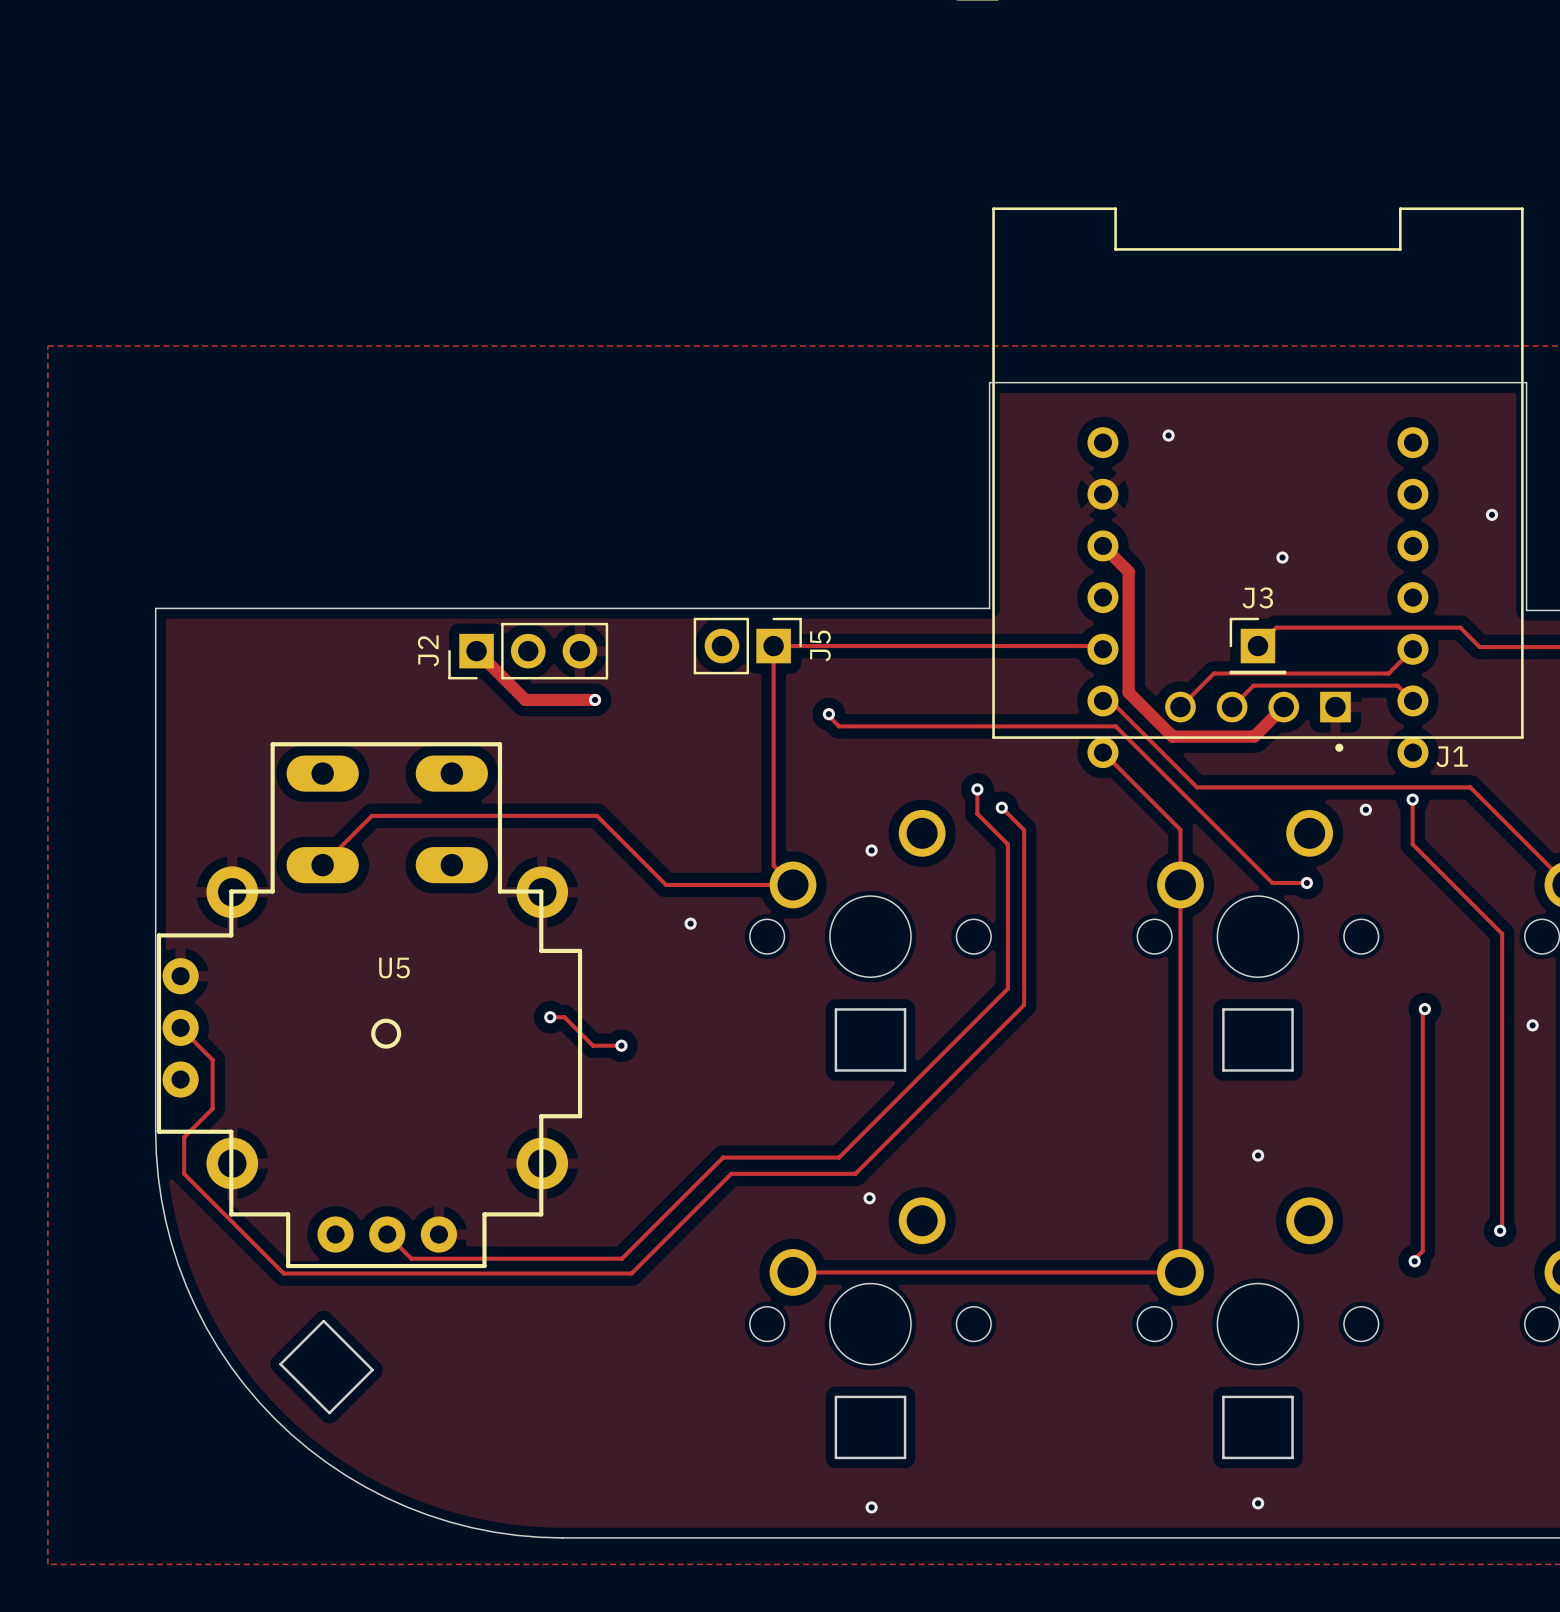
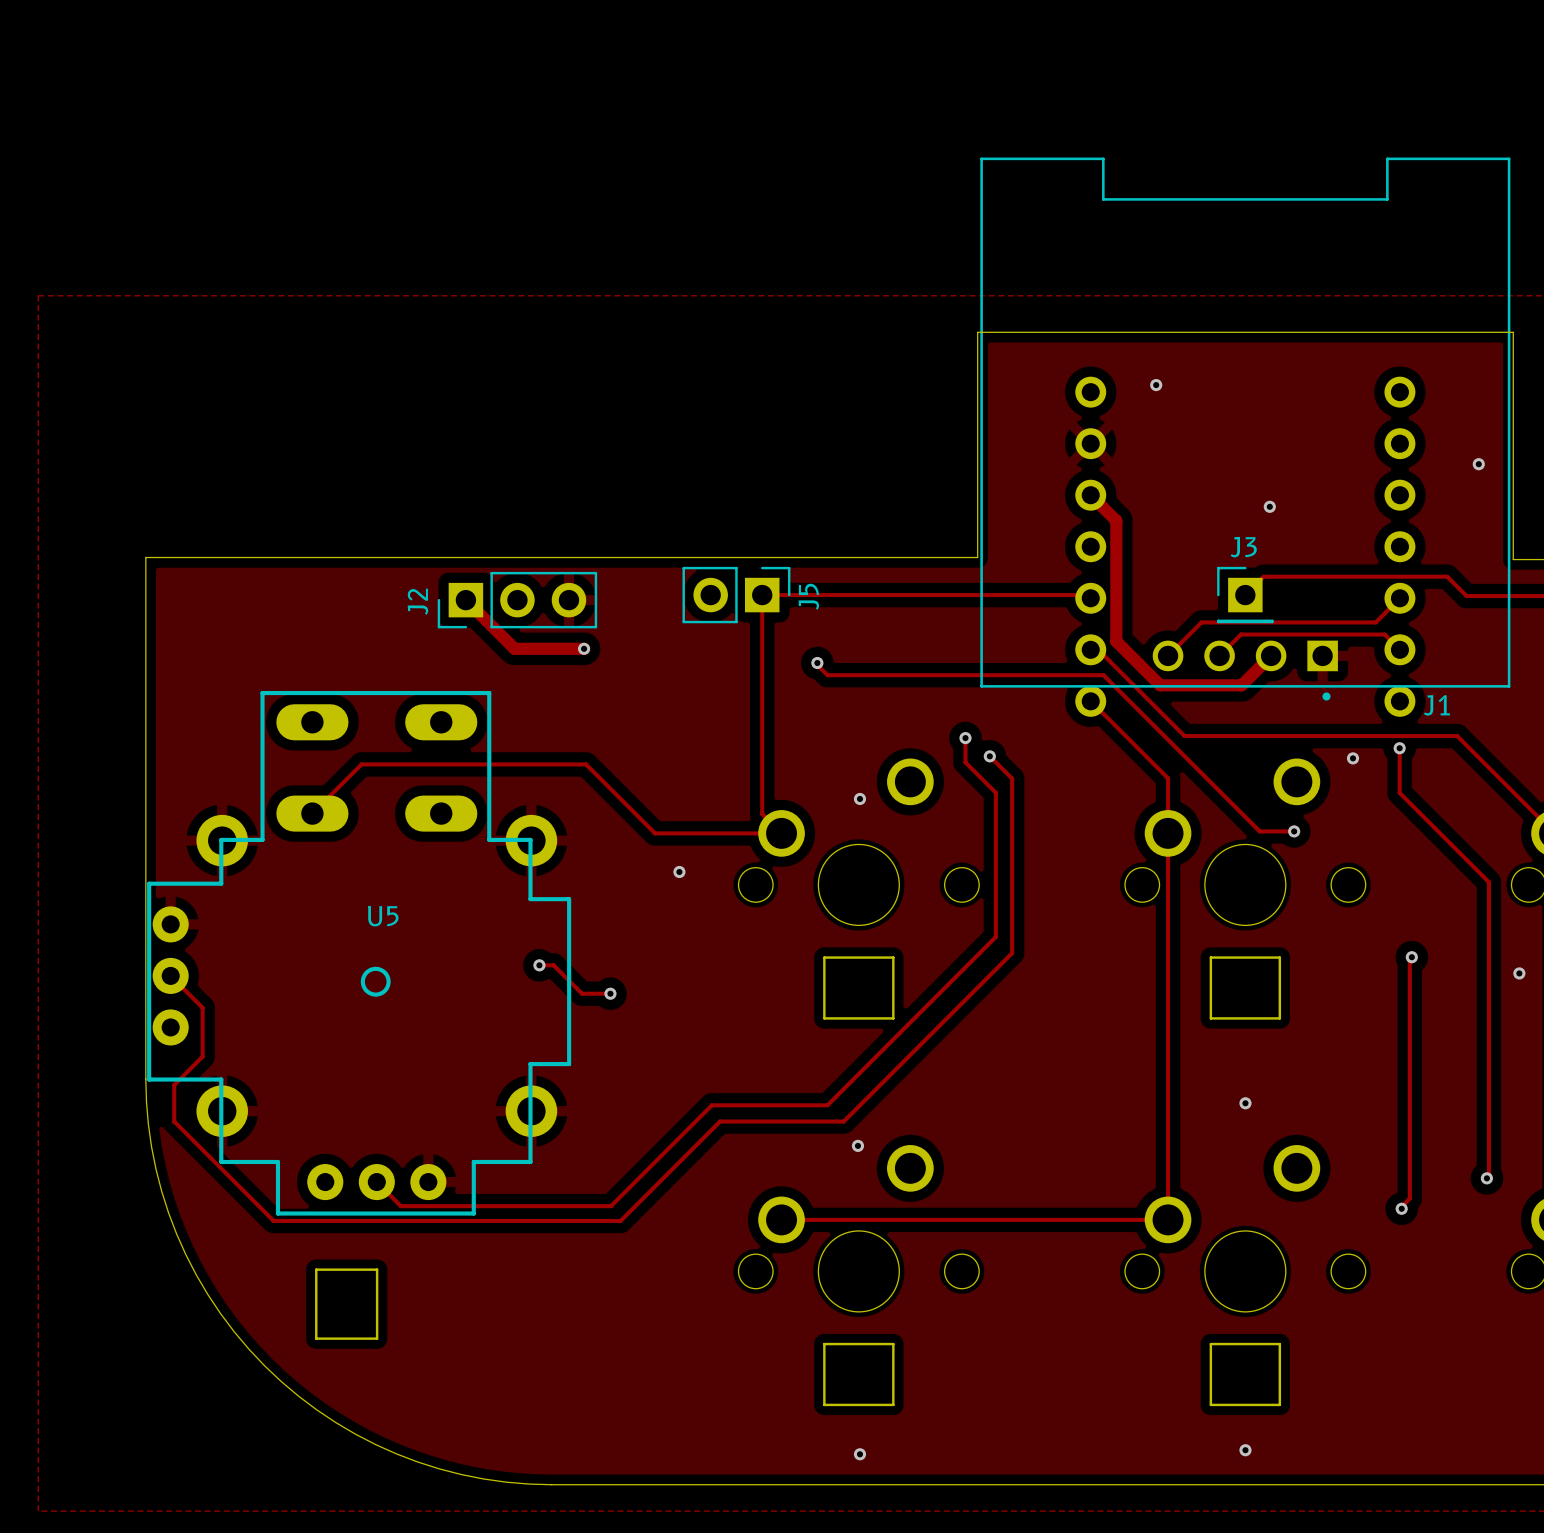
part: none -> (346, 1304)
part: (326, 1367) -> none

